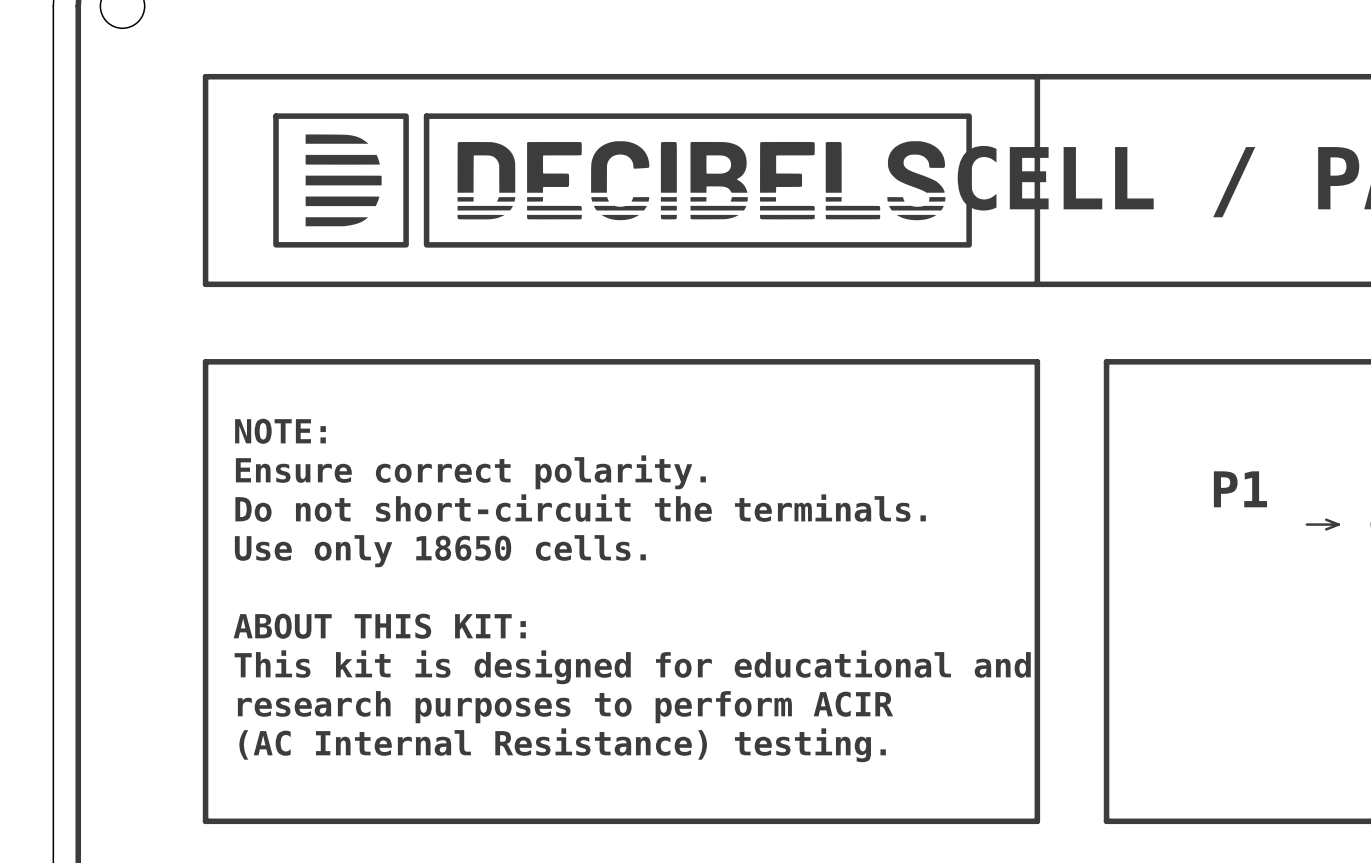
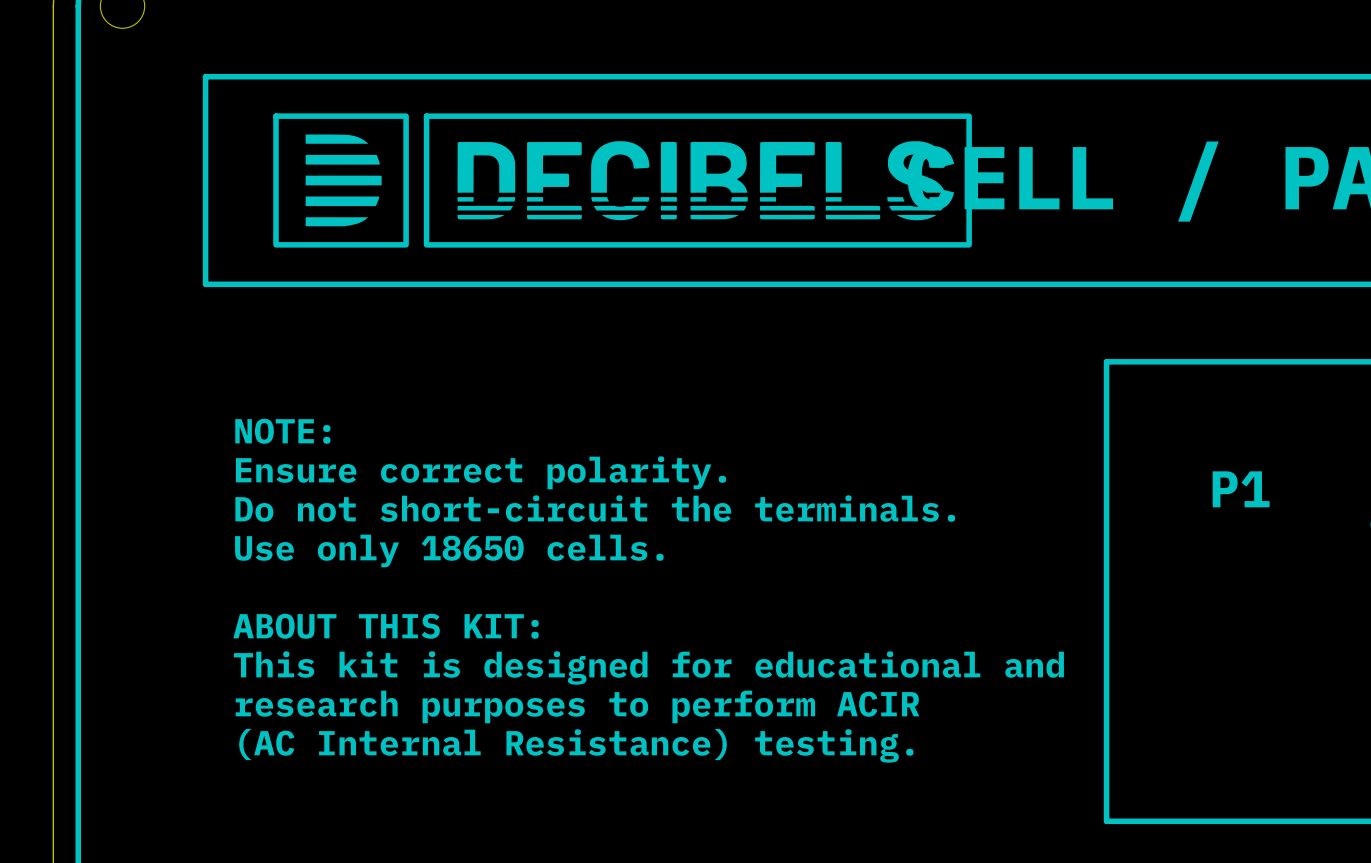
line: (1037, 76) (1037, 284) -> none
line: (205, 361) (205, 821) (1037, 821) (1037, 361) (205, 361) -> none
line: (1326, 519) (1338, 524) -> none
line: (1306, 524) (1338, 524) -> none
line: (1338, 524) (1326, 529) -> none

